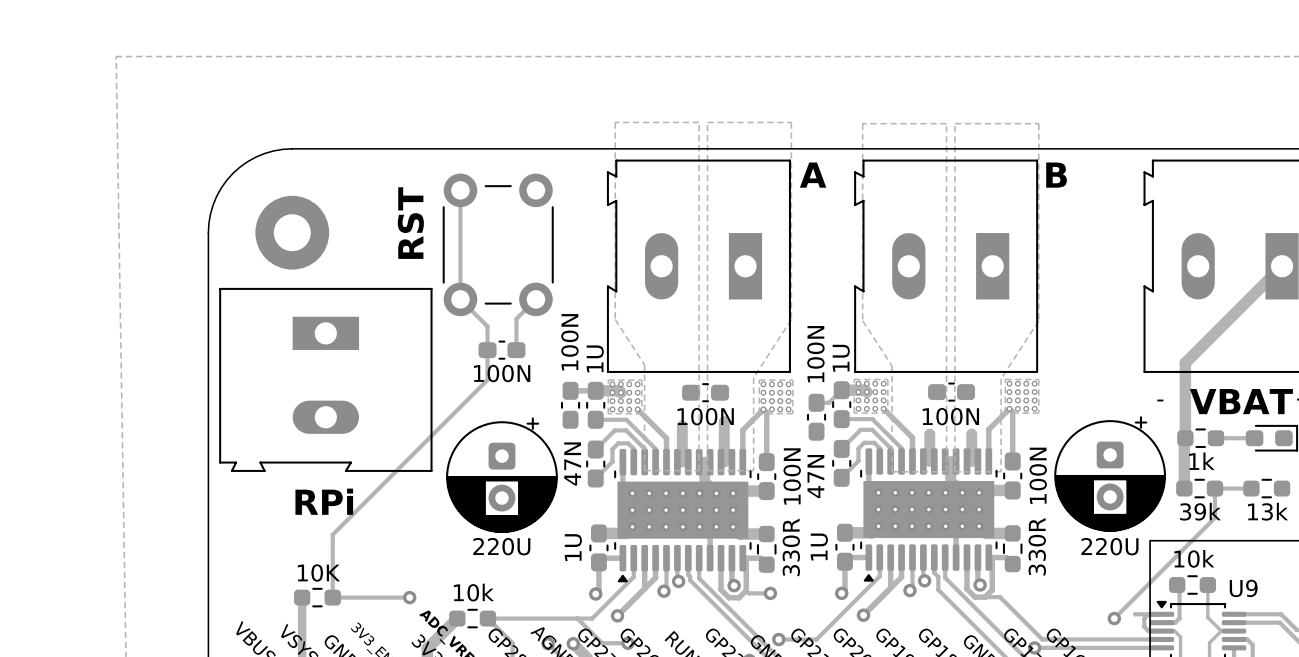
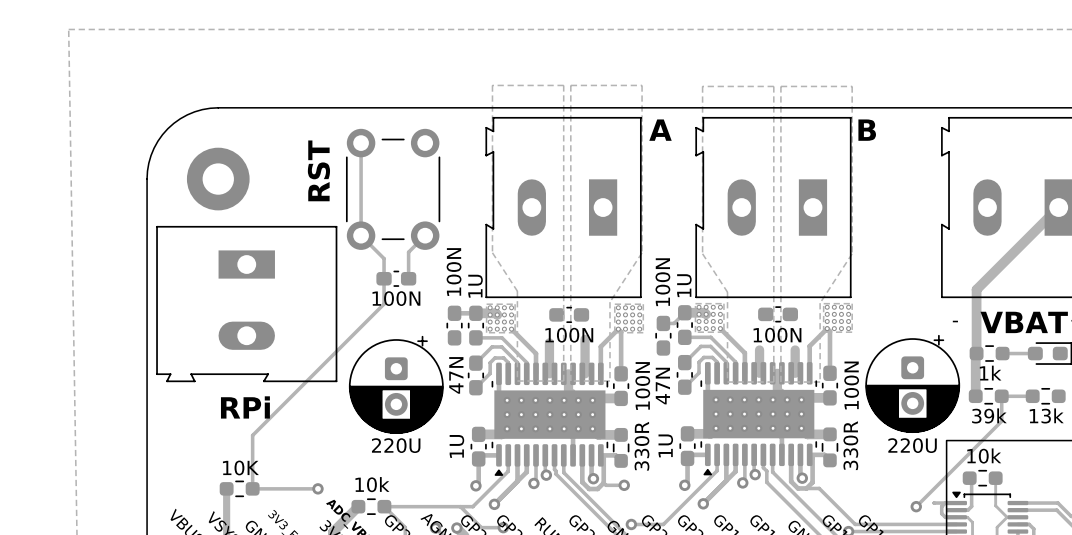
U9 name: U9 (1243, 588) -> none

